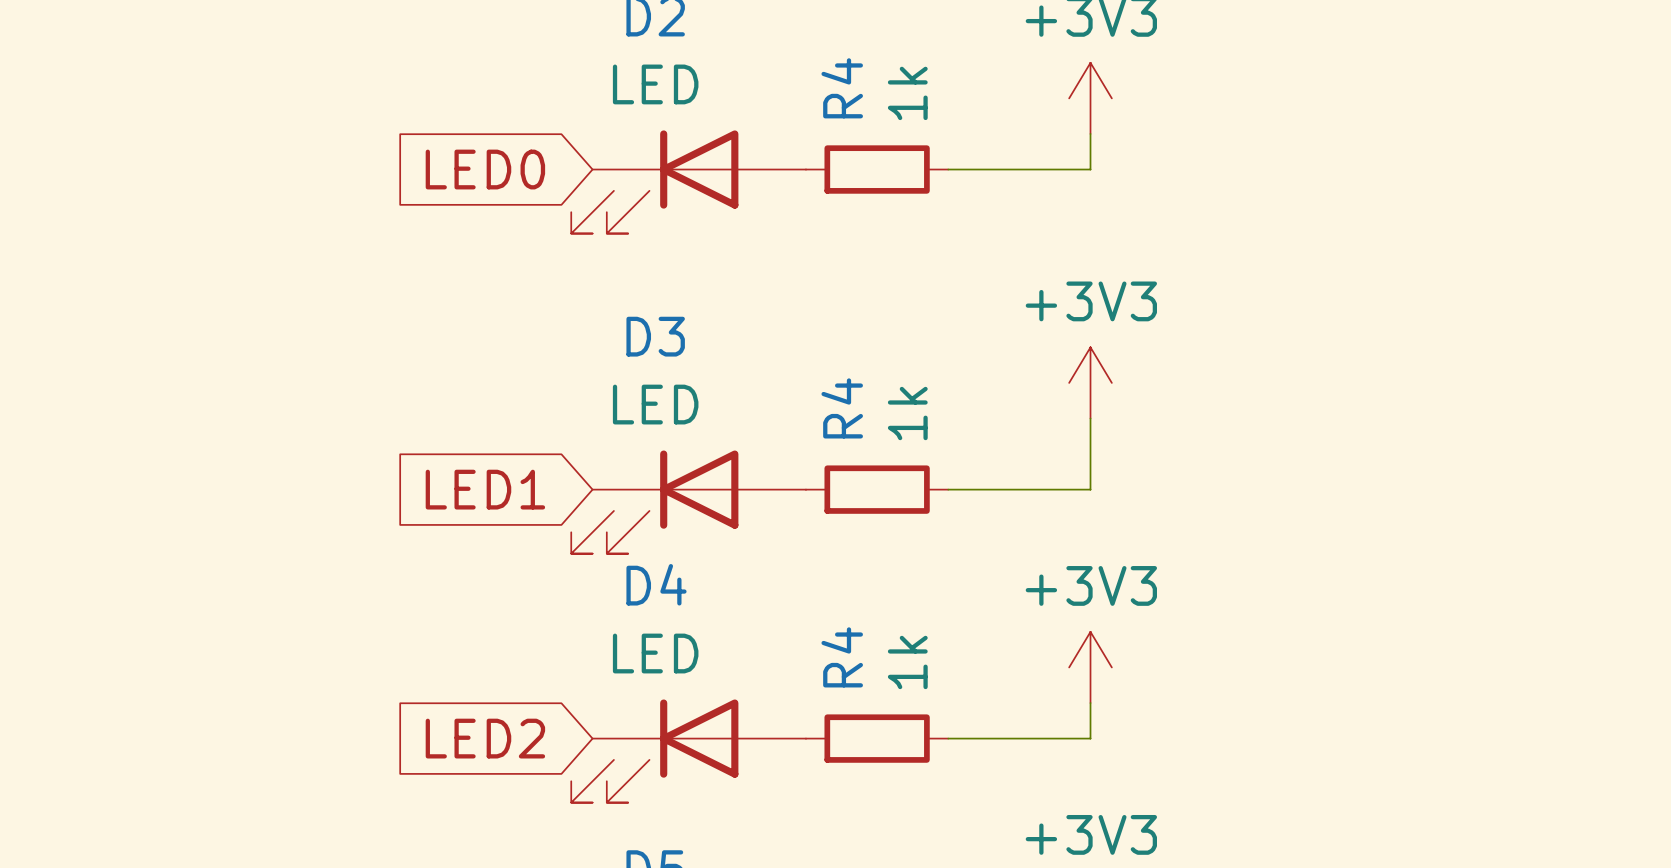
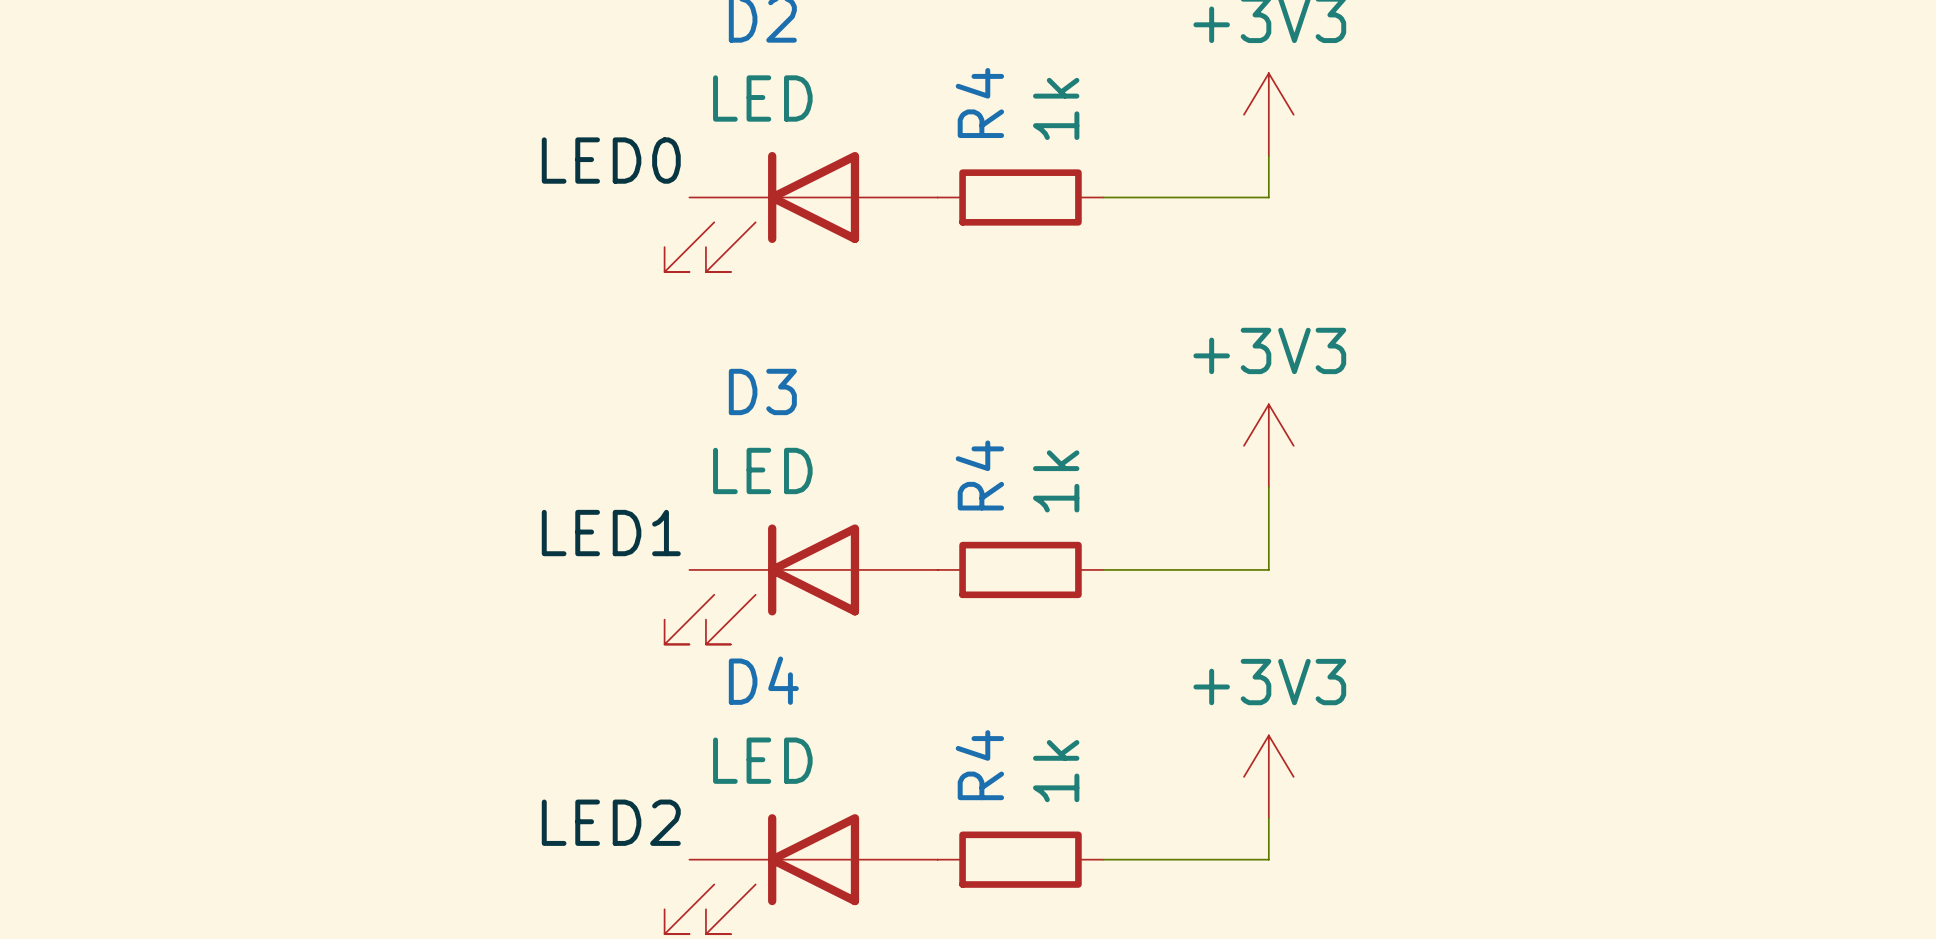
label: none -> LED0 (611, 160)
global label: LED0 (485, 169) -> none
label: none -> LED1 (611, 533)
global label: LED1 (485, 489) -> none
label: none -> LED2 (611, 822)
global label: LED2 (485, 738) -> none

